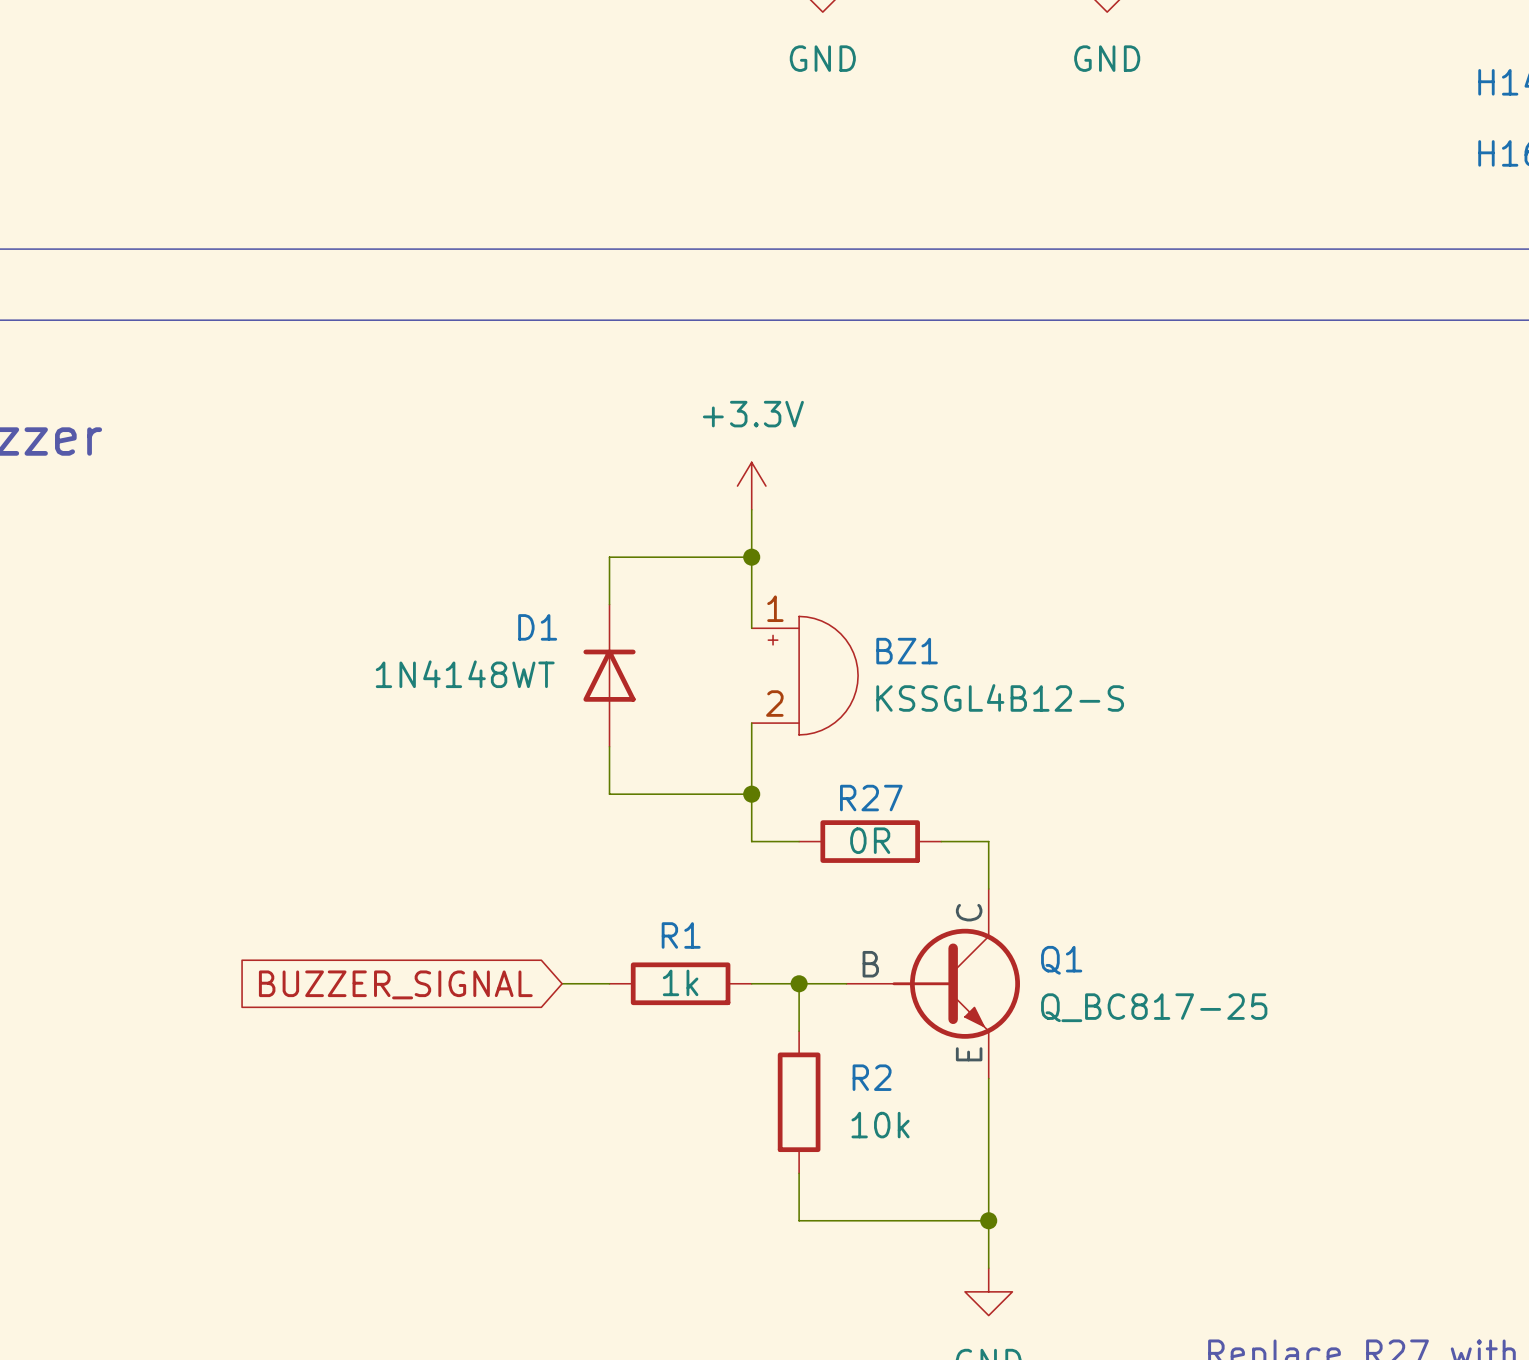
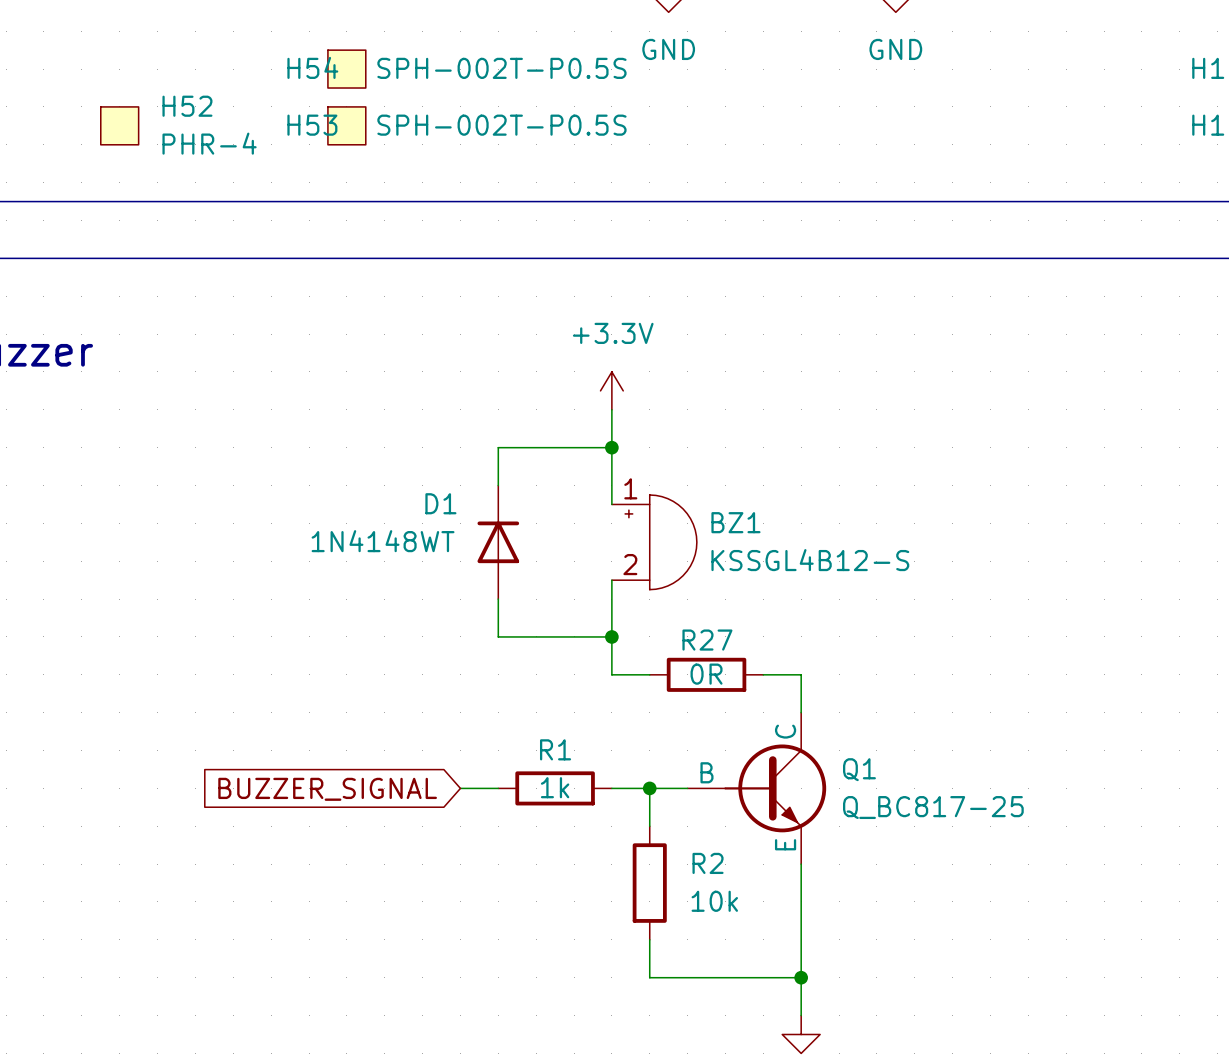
H54: none -> SPH-002T-P0.5S (346, 69)
H52: none -> PHR-4 (119, 125)
H53: none -> SPH-002T-P0.5S (346, 125)

